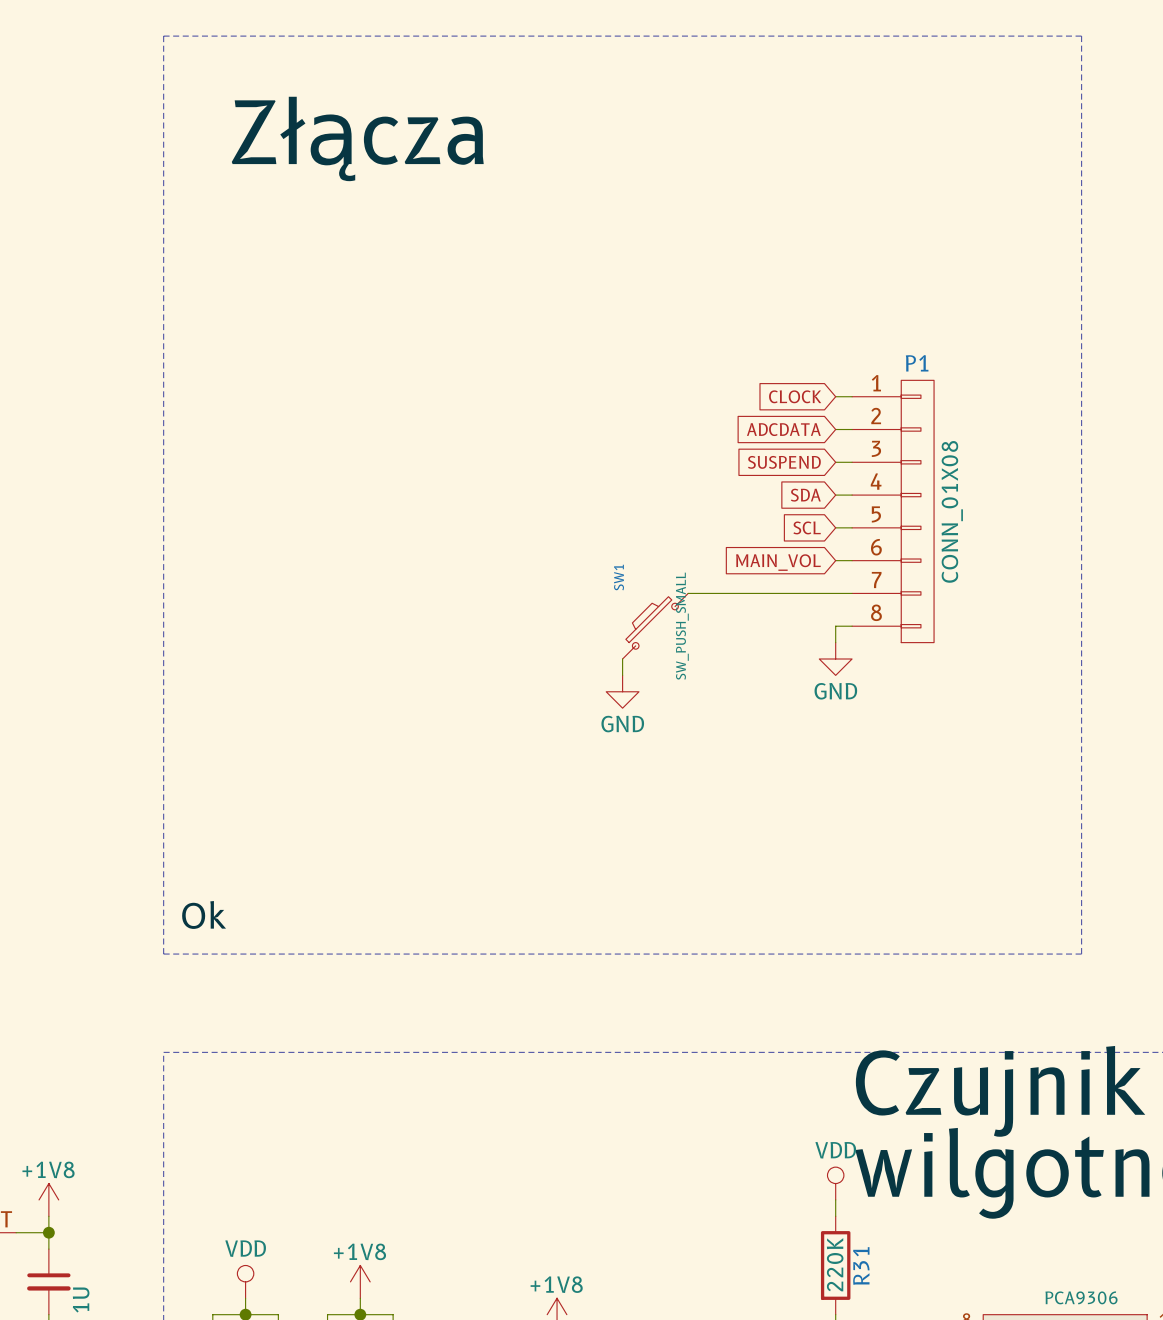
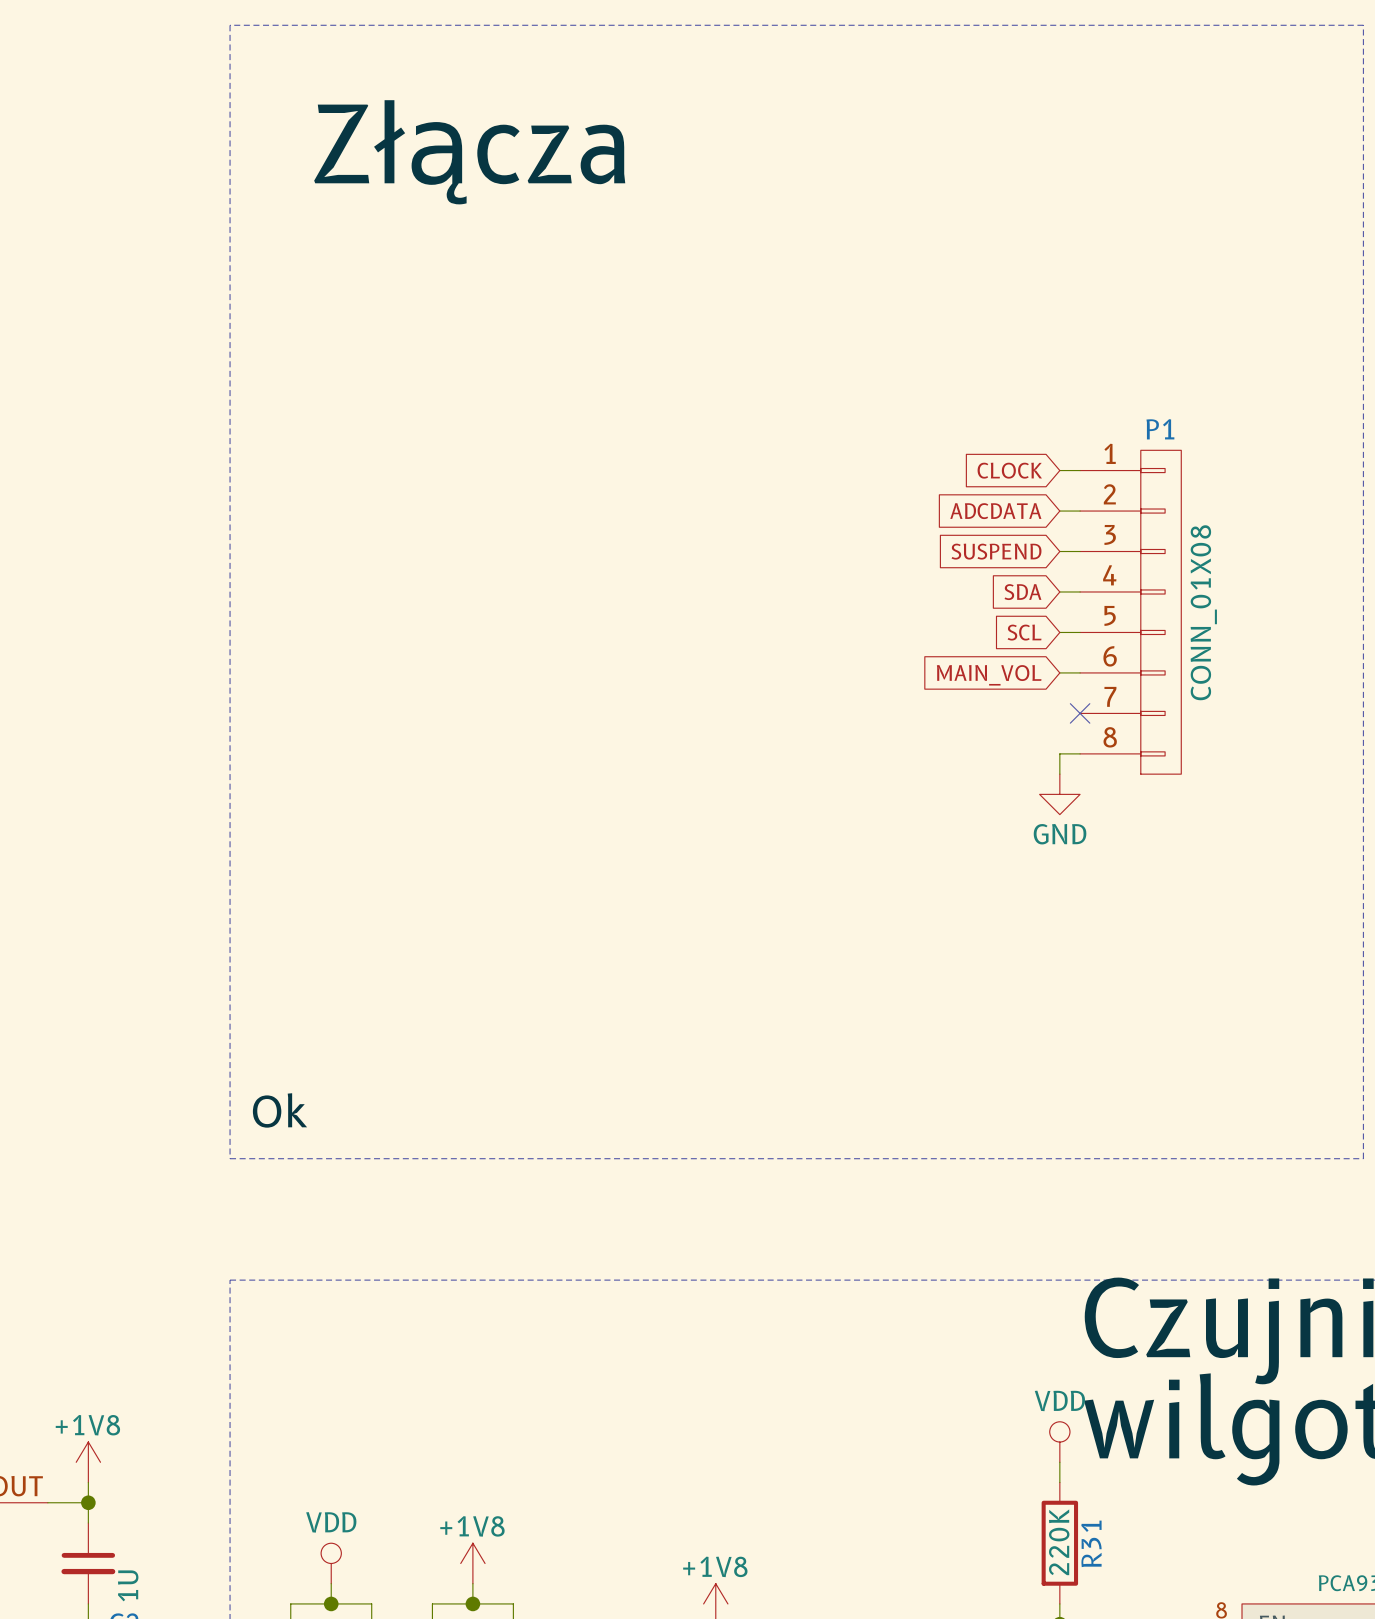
wire: (688, 593) (852, 593) -> none
no-connect mark: none -> (1080, 713)
SW1: SW_PUSH_SMALL (655, 626) -> none
wire: (622, 659) (622, 675) -> none
power symbol: GND (622, 691) -> none

